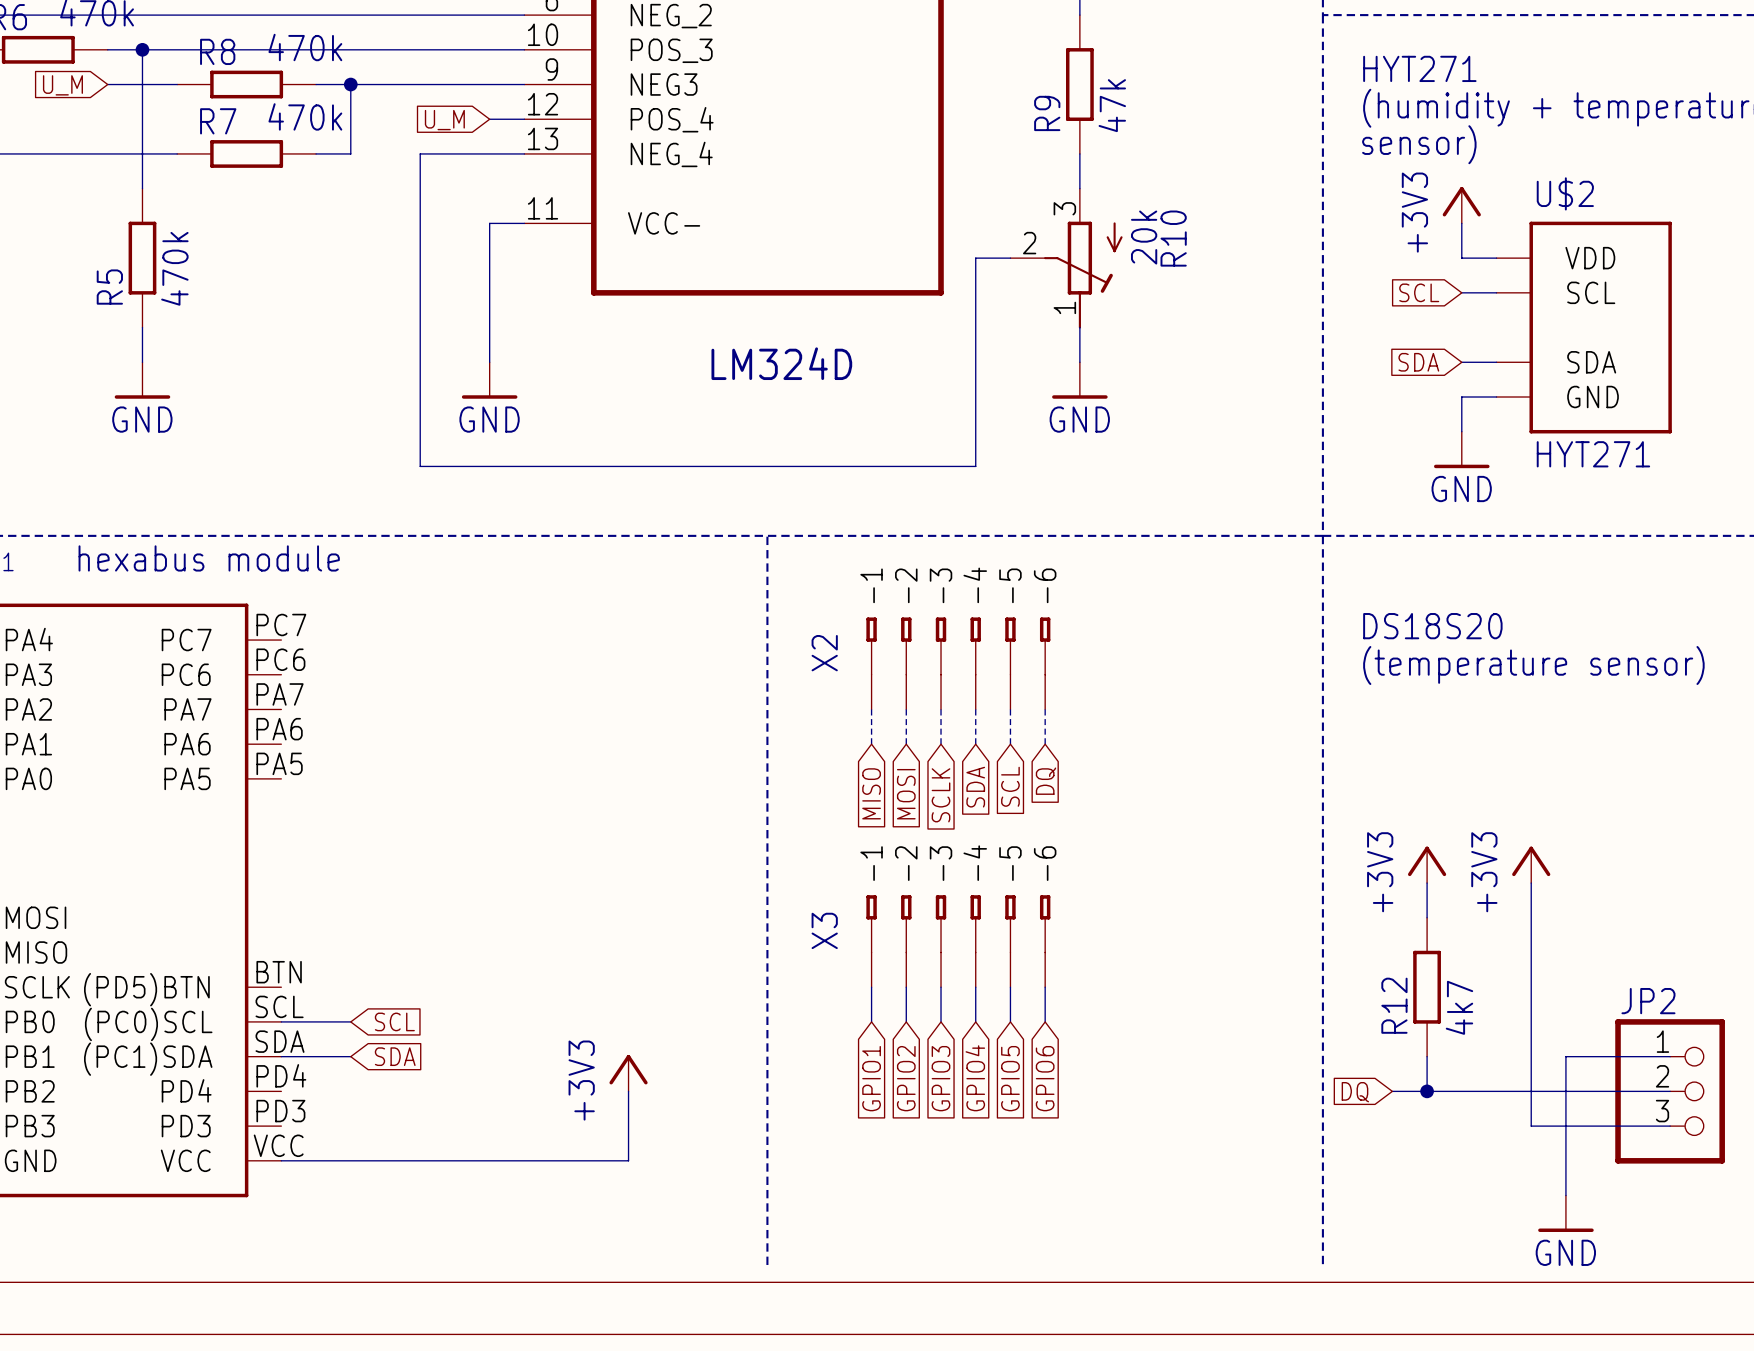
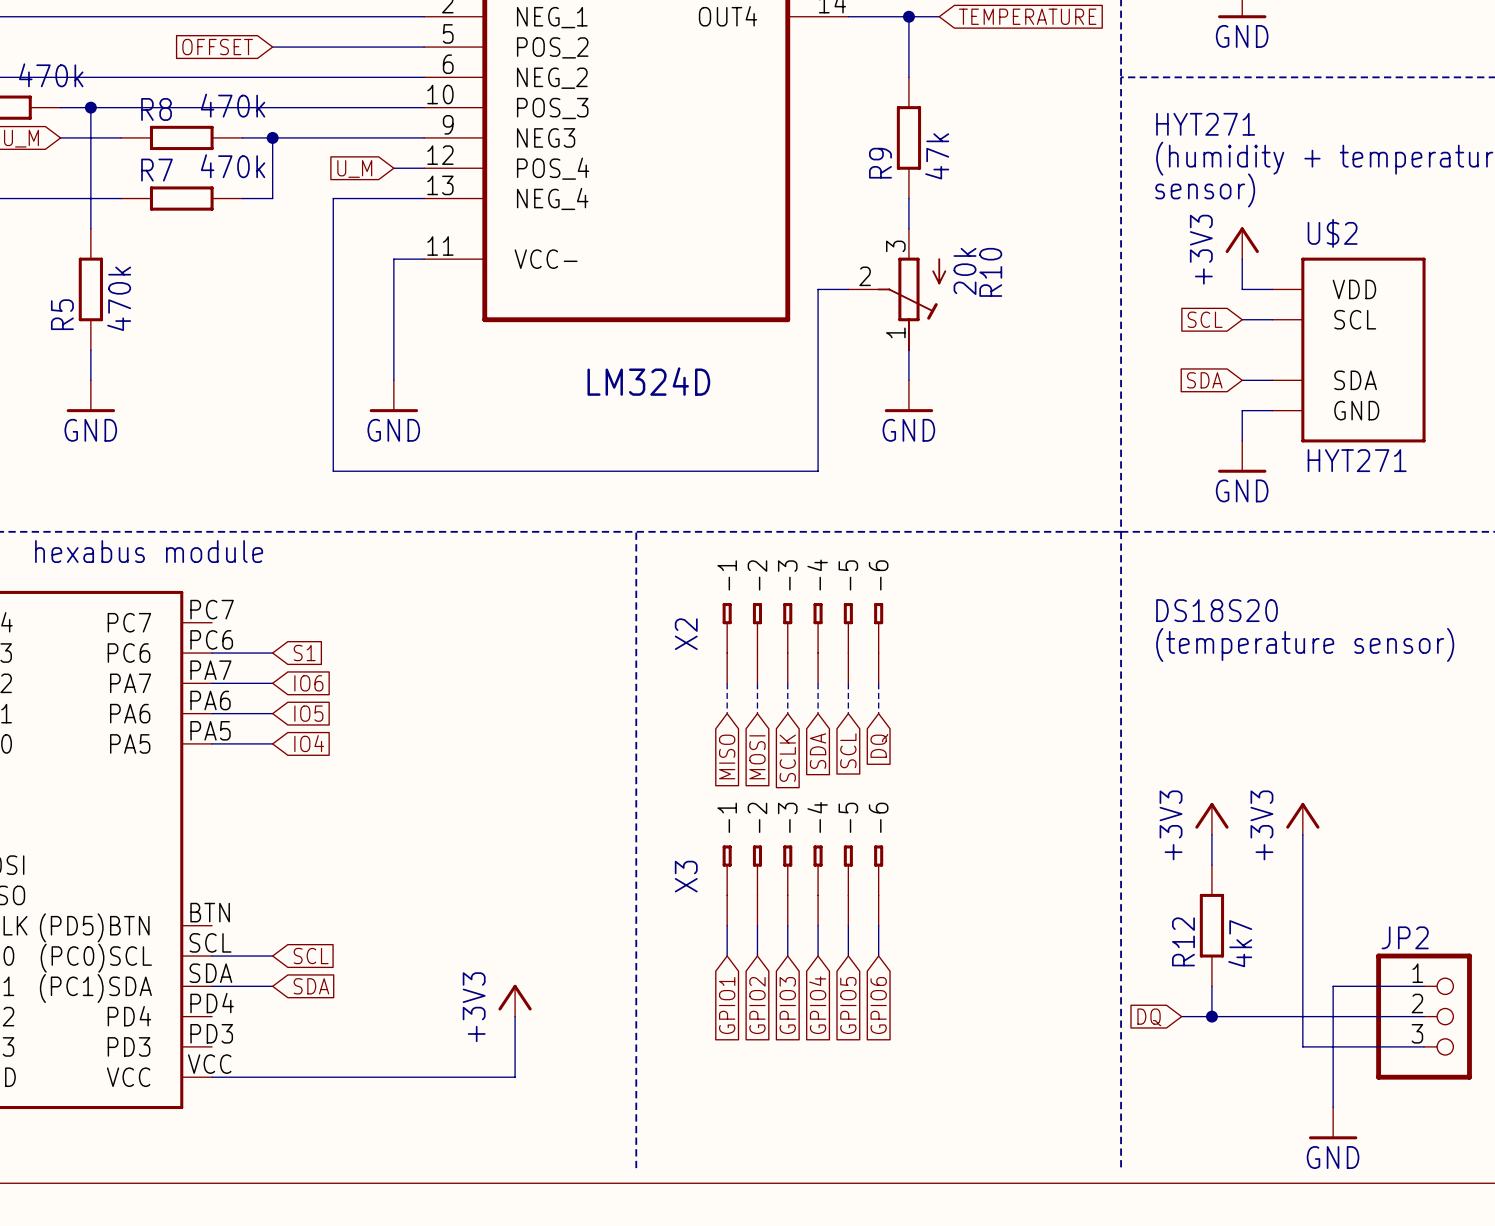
wire: none -> (212, 653) (272, 653)
global label: none -> S1 (304, 653)
wire: none -> (212, 683) (272, 683)
global label: none -> IO6 (308, 683)
wire: none -> (212, 713) (272, 713)
global label: none -> IO5 (308, 713)
wire: none -> (212, 743) (272, 743)
global label: none -> IO4 (309, 743)

